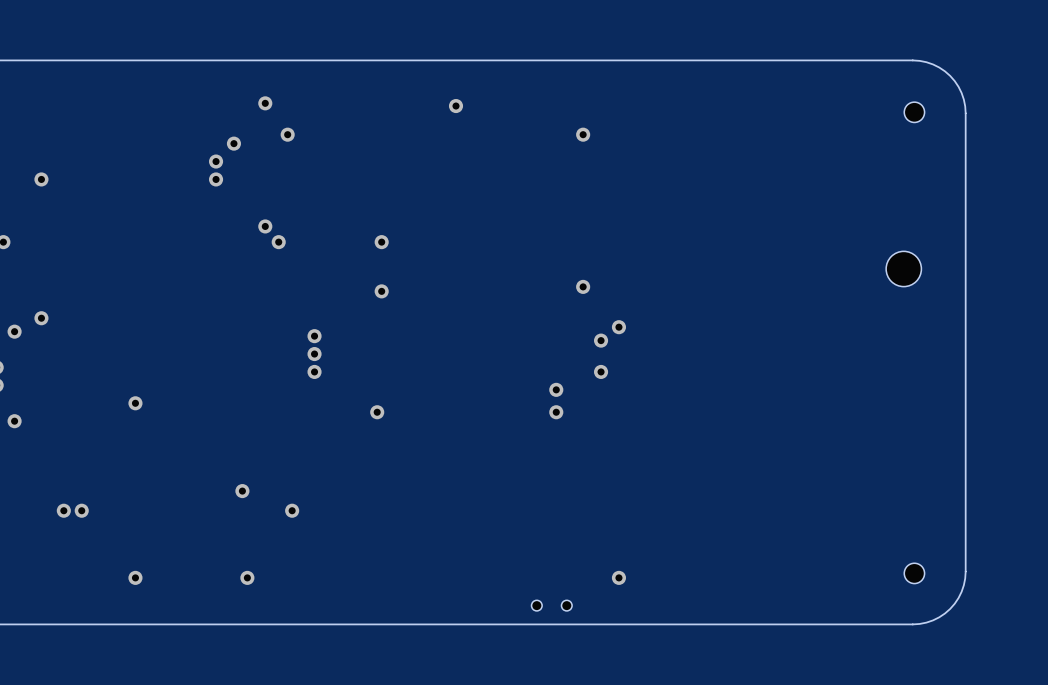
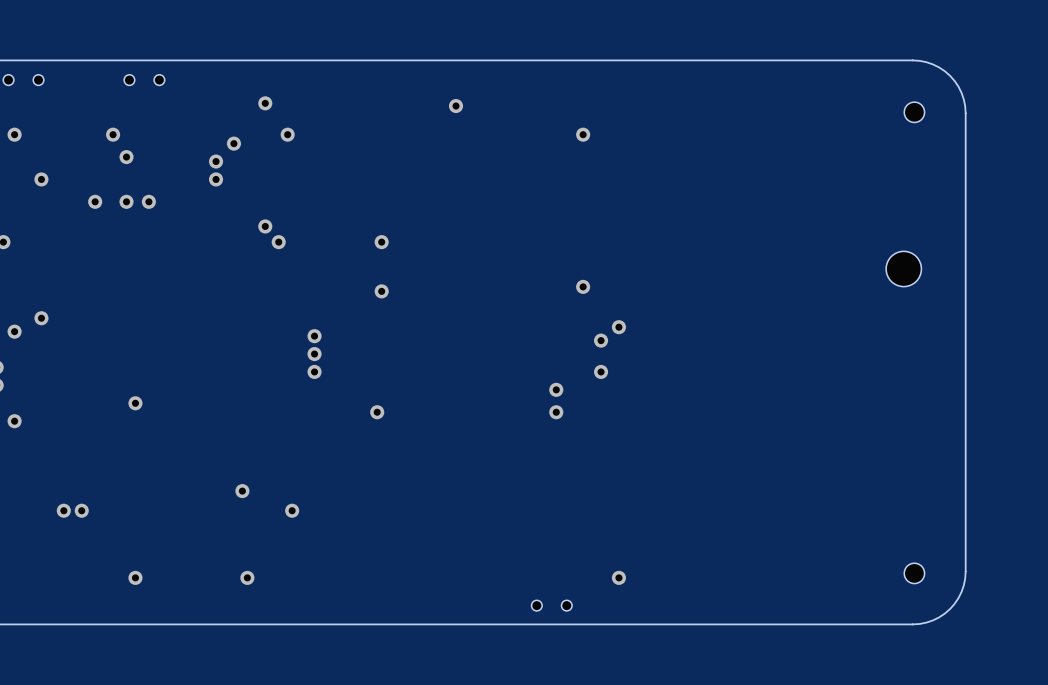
part: none -> (23, 80)
part: none -> (144, 80)
via: none -> (14, 134)
via: none -> (113, 134)
via: none -> (126, 157)
via: none -> (95, 201)
via: none -> (126, 201)
via: none -> (148, 201)

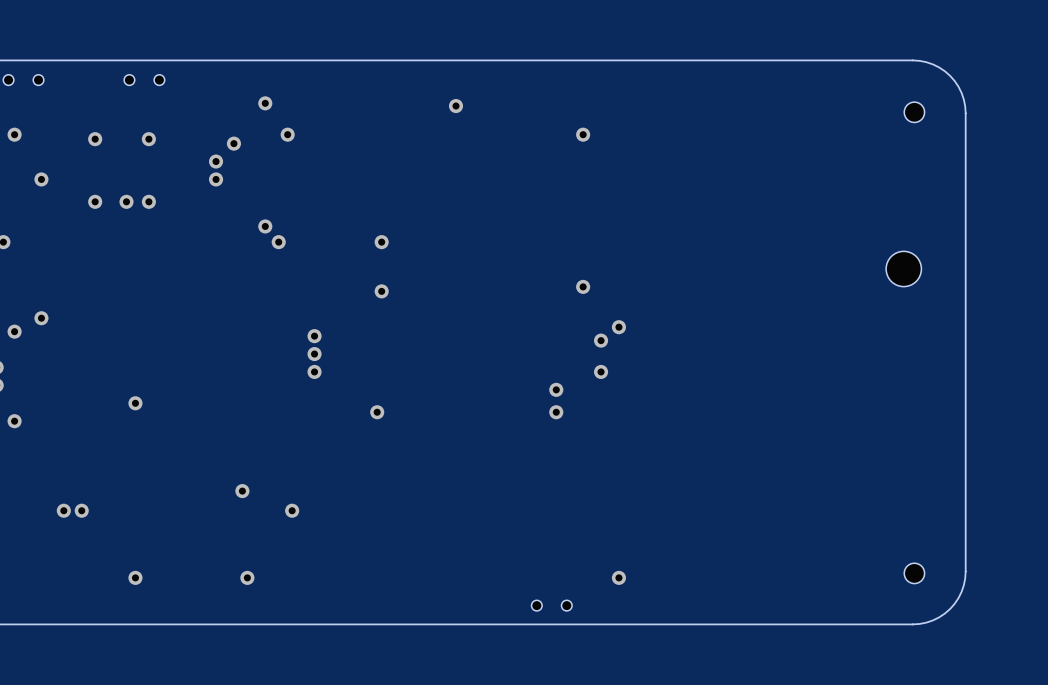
via: (113, 134) -> none
via: none -> (95, 139)
via: none -> (148, 139)
via: (126, 157) -> none

